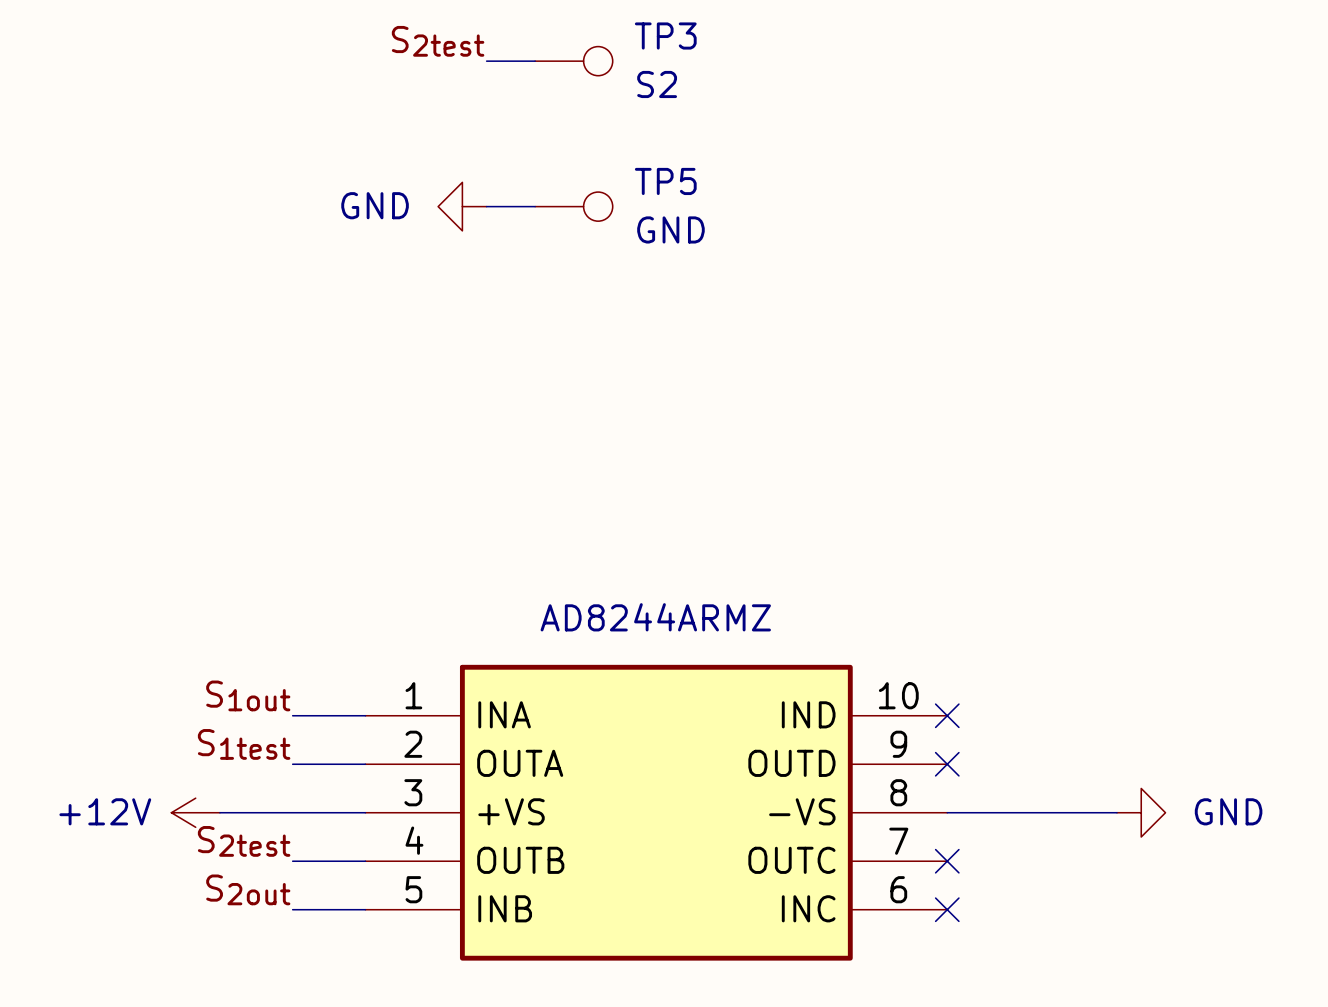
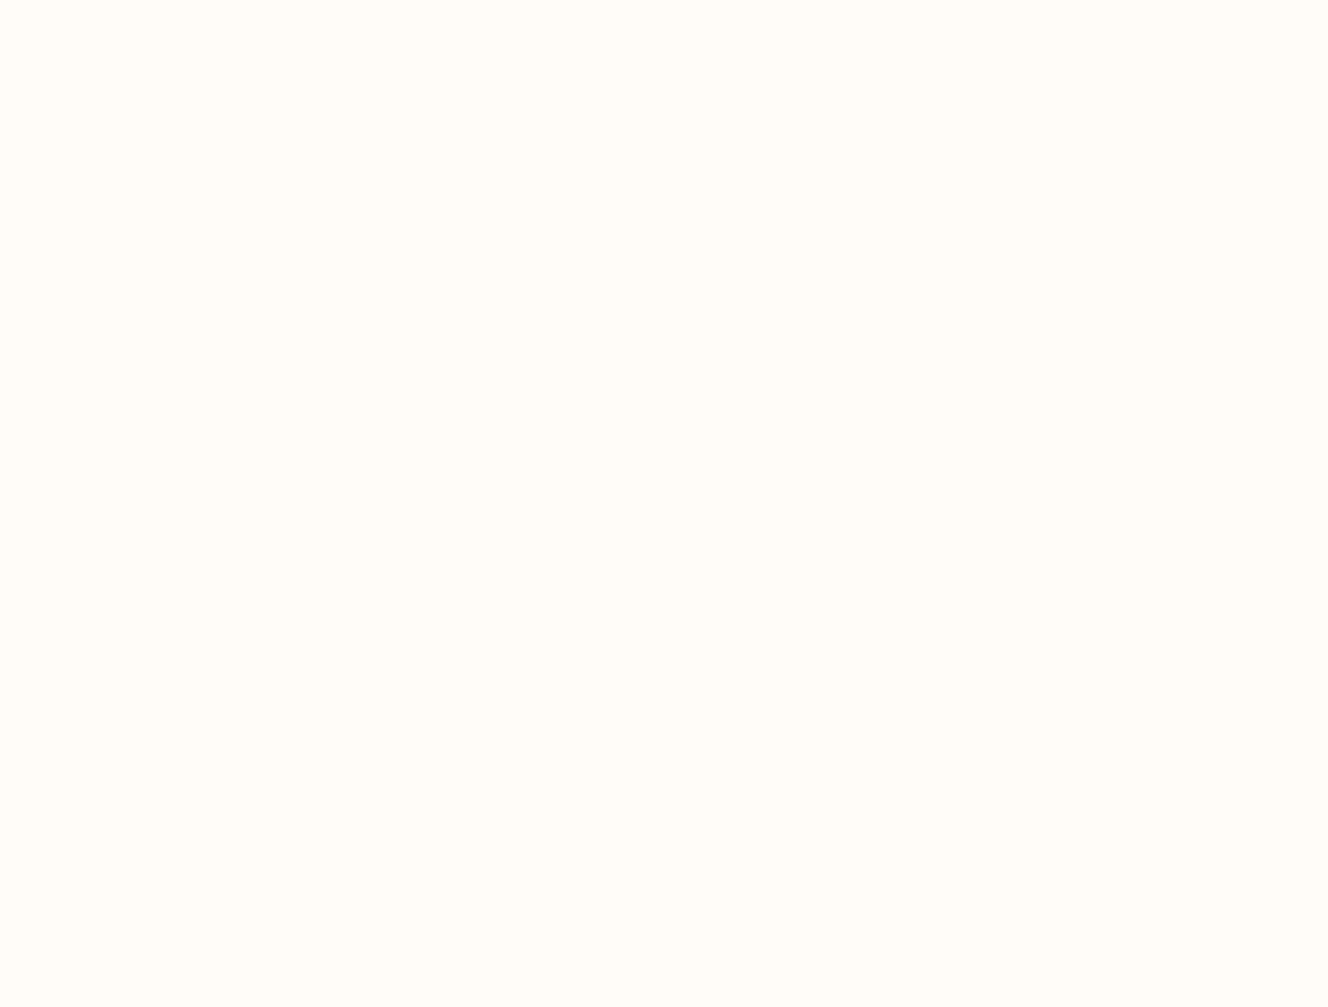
label: S2test (438, 41) -> none
wire: (486, 61) (535, 61) -> none
TP3: S2 (573, 61) -> none
power symbol: GND (462, 206) -> none
wire: (486, 206) (535, 206) -> none
TP5: GND (573, 206) -> none
label: S1out (248, 695) -> none
wire: (292, 715) (365, 715) -> none
no-connect mark: (947, 715) -> none
label: S1test (244, 744) -> none
wire: (292, 764) (365, 764) -> none
no-connect mark: (947, 764) -> none
power symbol: +12V (195, 812) -> none
wire: (219, 812) (365, 812) -> none
part: AD8244ARMZ (656, 812) -> none
wire: (947, 812) (1116, 812) -> none
power symbol: GND (1141, 812) -> none
label: S2test (244, 841) -> none
wire: (292, 861) (365, 861) -> none
no-connect mark: (947, 861) -> none
label: S2out (248, 889) -> none
wire: (292, 909) (365, 909) -> none
no-connect mark: (947, 909) -> none

